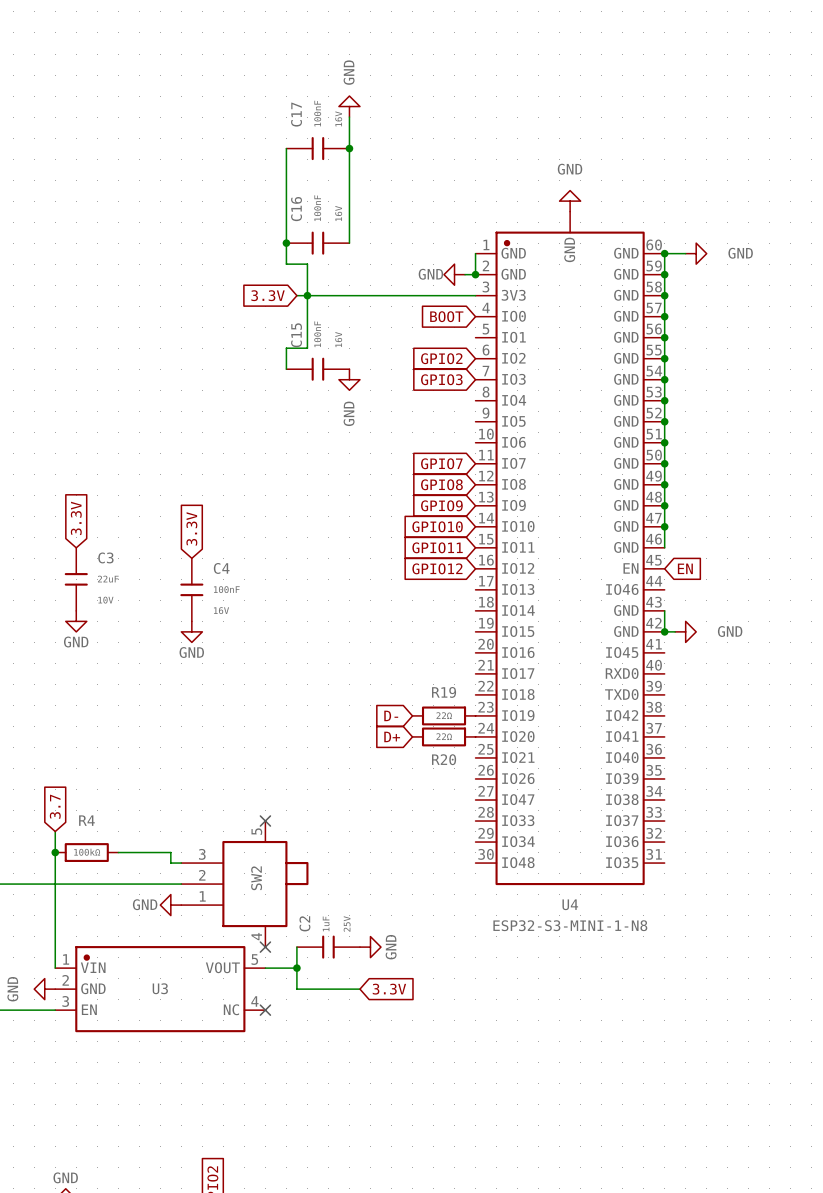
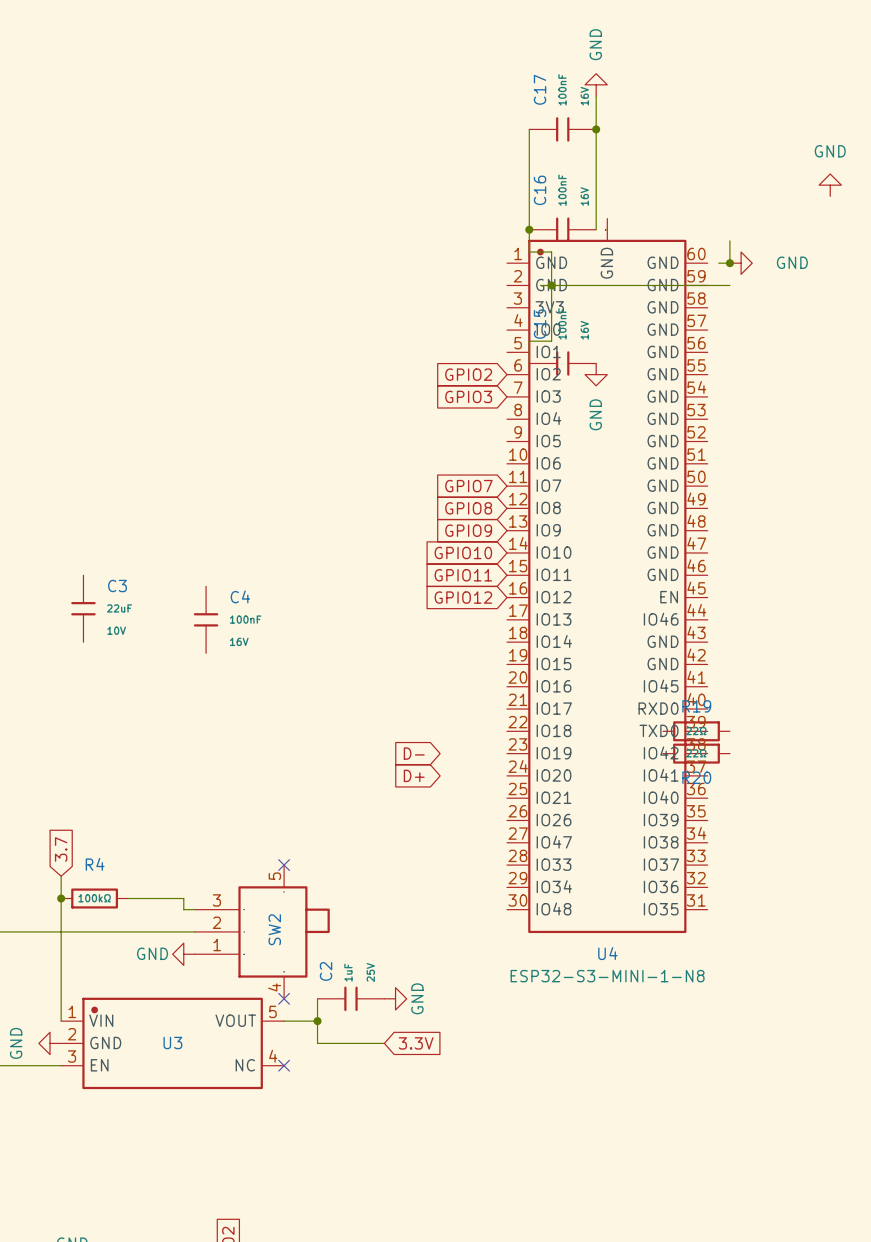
power symbol: none -> GND (596, 84)
wire: none -> (596, 95) (596, 229)
power symbol: GND (349, 106) -> none
wire: (349, 117) (349, 243) -> none
wire: none -> (529, 129) (529, 252) (551, 252) (551, 341) (529, 341) (529, 363)
junction: none -> (596, 129)
wire: (286, 148) (286, 264) (307, 264) (307, 348) (286, 348) (286, 369) -> none
C17 position: (317, 148) -> (562, 129)
junction: (349, 148) -> none
power symbol: none -> GND (830, 185)
power symbol: GND (570, 201) -> none
junction: none -> (529, 229)
wire: none -> (729, 240) (729, 263)
junction: (286, 243) -> none
C16 position: (317, 243) -> (562, 229)
wire: (475, 253) (475, 274) (465, 274) -> none
junction: (664, 253) -> none
wire: (675, 253) (664, 253) (664, 547) -> none
junction: none -> (729, 263)
power symbol: GND (454, 274) -> none
junction: (475, 274) -> none
wire: none -> (540, 285) (729, 285)
junction: none -> (551, 285)
junction: (664, 274) -> none
global label: 3.3V (268, 295) -> none
wire: (296, 295) (475, 295) -> none
junction: (307, 295) -> none
junction: (664, 295) -> none
global label: BOOT (446, 316) -> none
junction: (664, 316) -> none
junction: (664, 337) -> none
power symbol: none -> GND (596, 374)
junction: (664, 358) -> none
C15 position: (317, 369) -> (562, 363)
power symbol: GND (349, 379) -> none
junction: (664, 379) -> none
junction: (664, 400) -> none
junction: (664, 421) -> none
junction: (664, 442) -> none
junction: (664, 463) -> none
junction: (664, 484) -> none
junction: (664, 505) -> none
global label: 3.3V (76, 518) -> none
junction: (664, 526) -> none
global label: 3.3V (191, 528) -> none
global label: EN (685, 568) -> none
wire: (664, 610) (664, 631) (675, 631) -> none
power symbol: GND (76, 621) -> none
power symbol: GND (191, 631) -> none
junction: (664, 631) -> none
power symbol: GND (685, 631) -> none
R19 position: (444, 715) -> (696, 731)
R20 position: (444, 736) -> (696, 753)

